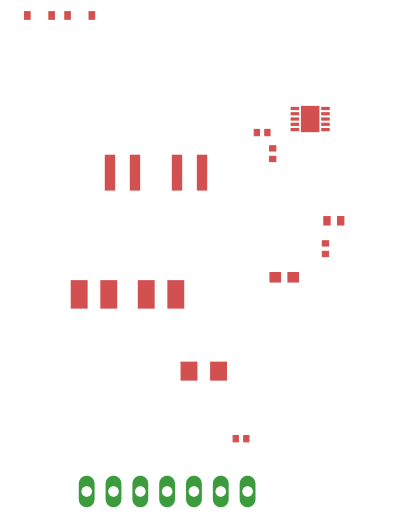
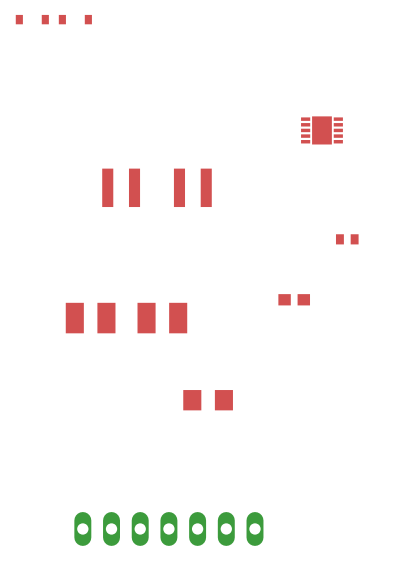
part: (262, 132) -> none
part: (272, 153) -> none
part: (325, 248) -> none
part: (241, 438) -> none

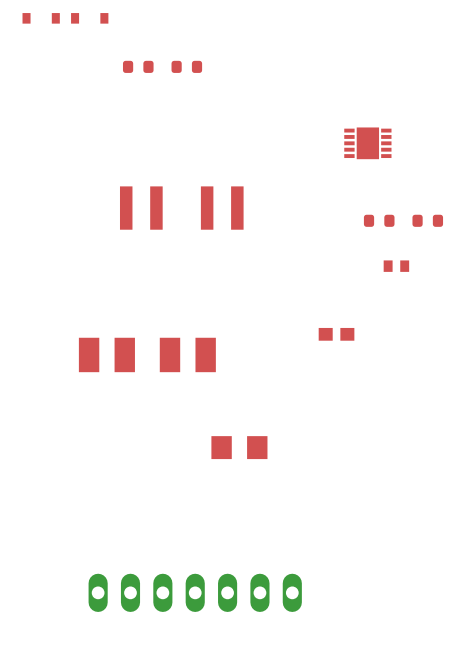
part: none -> (138, 66)
part: none -> (186, 66)
part: none -> (379, 220)
part: none -> (427, 220)

